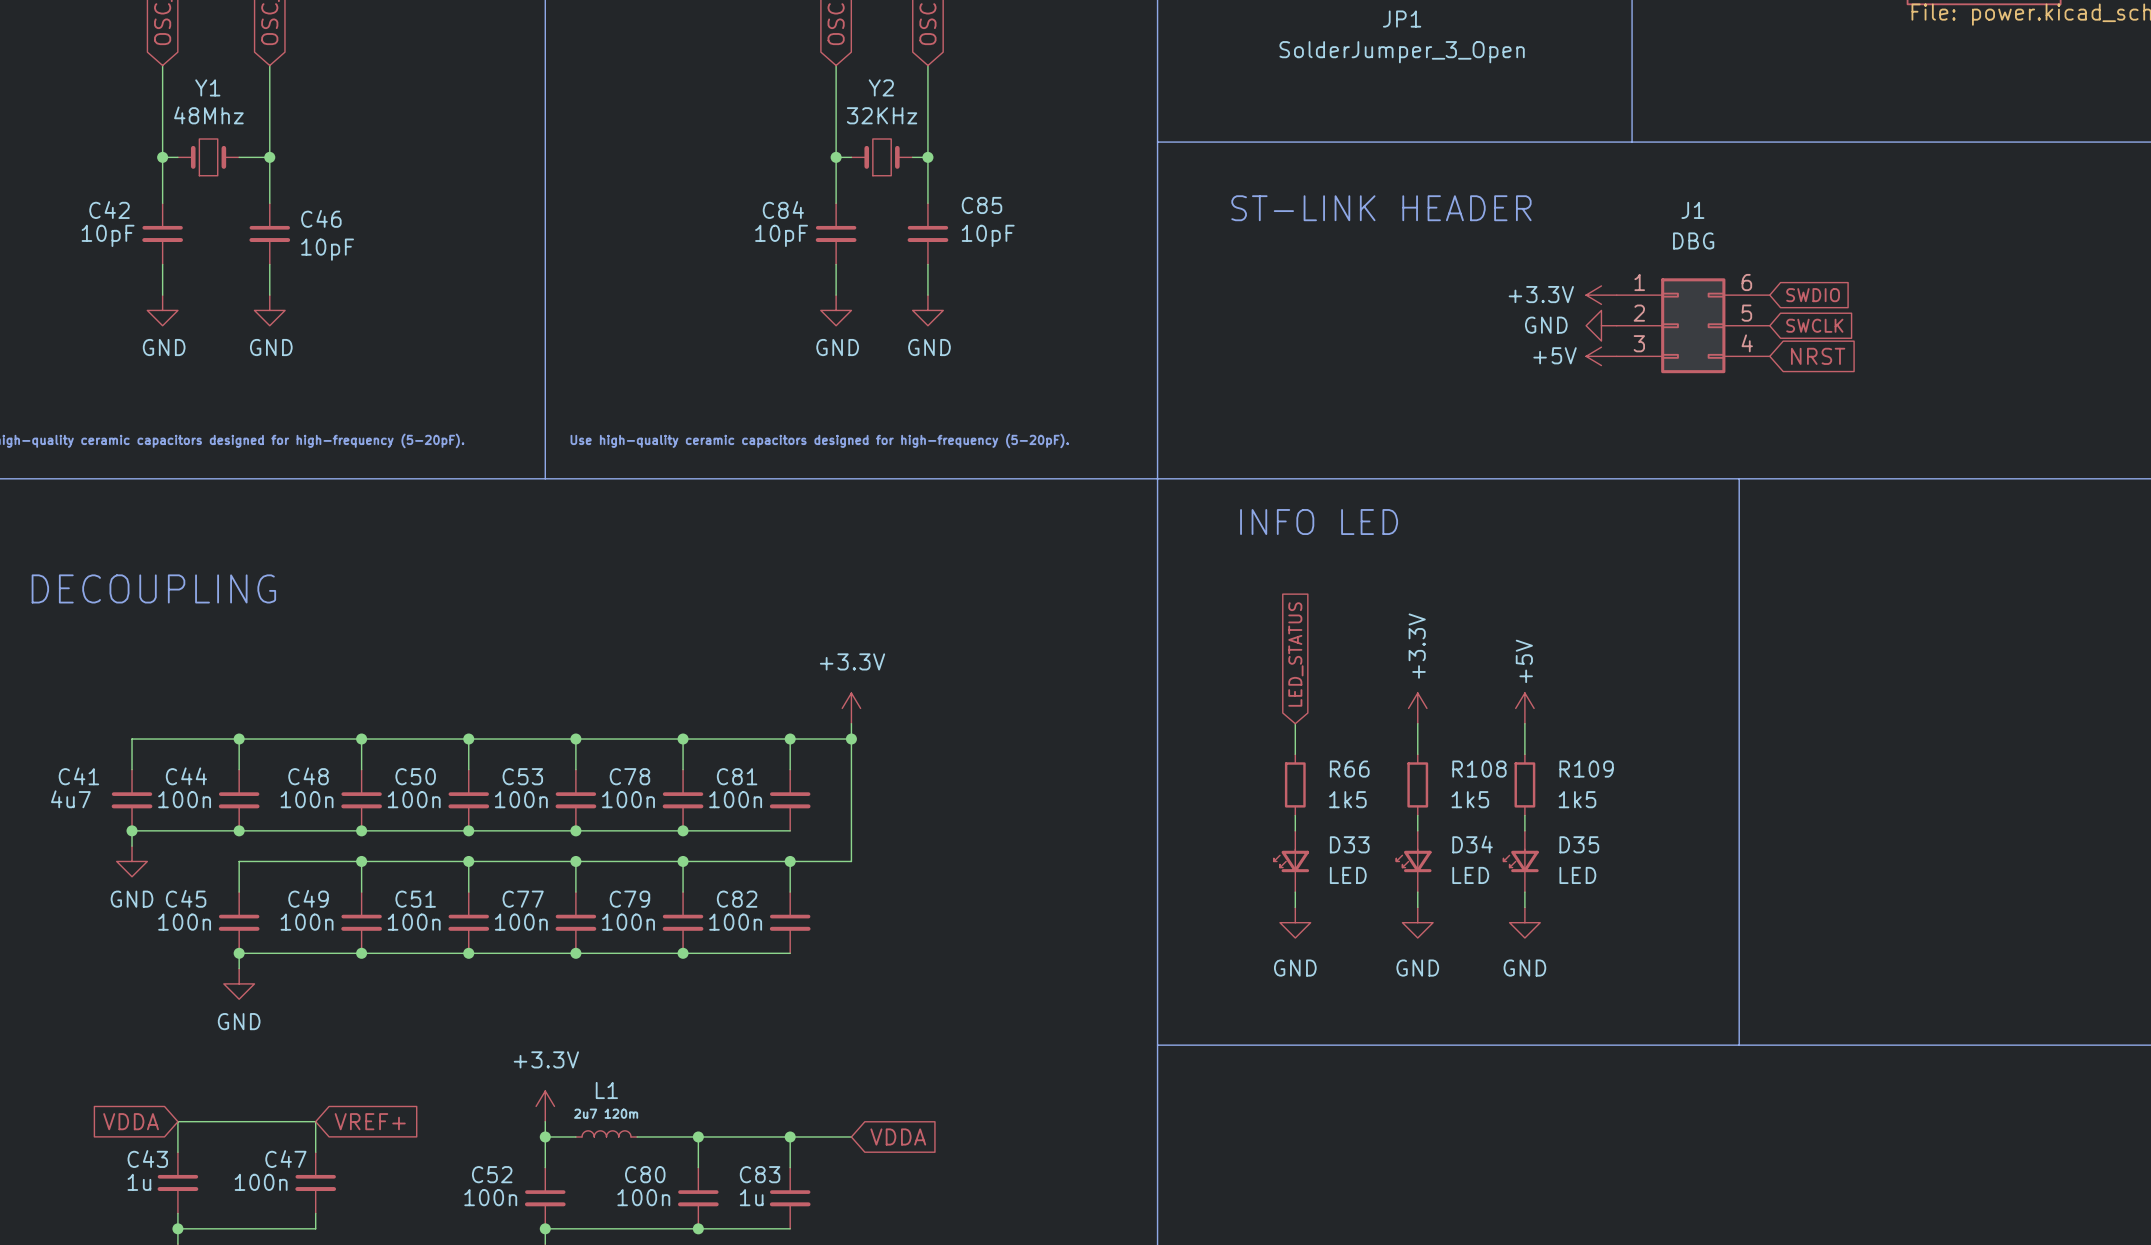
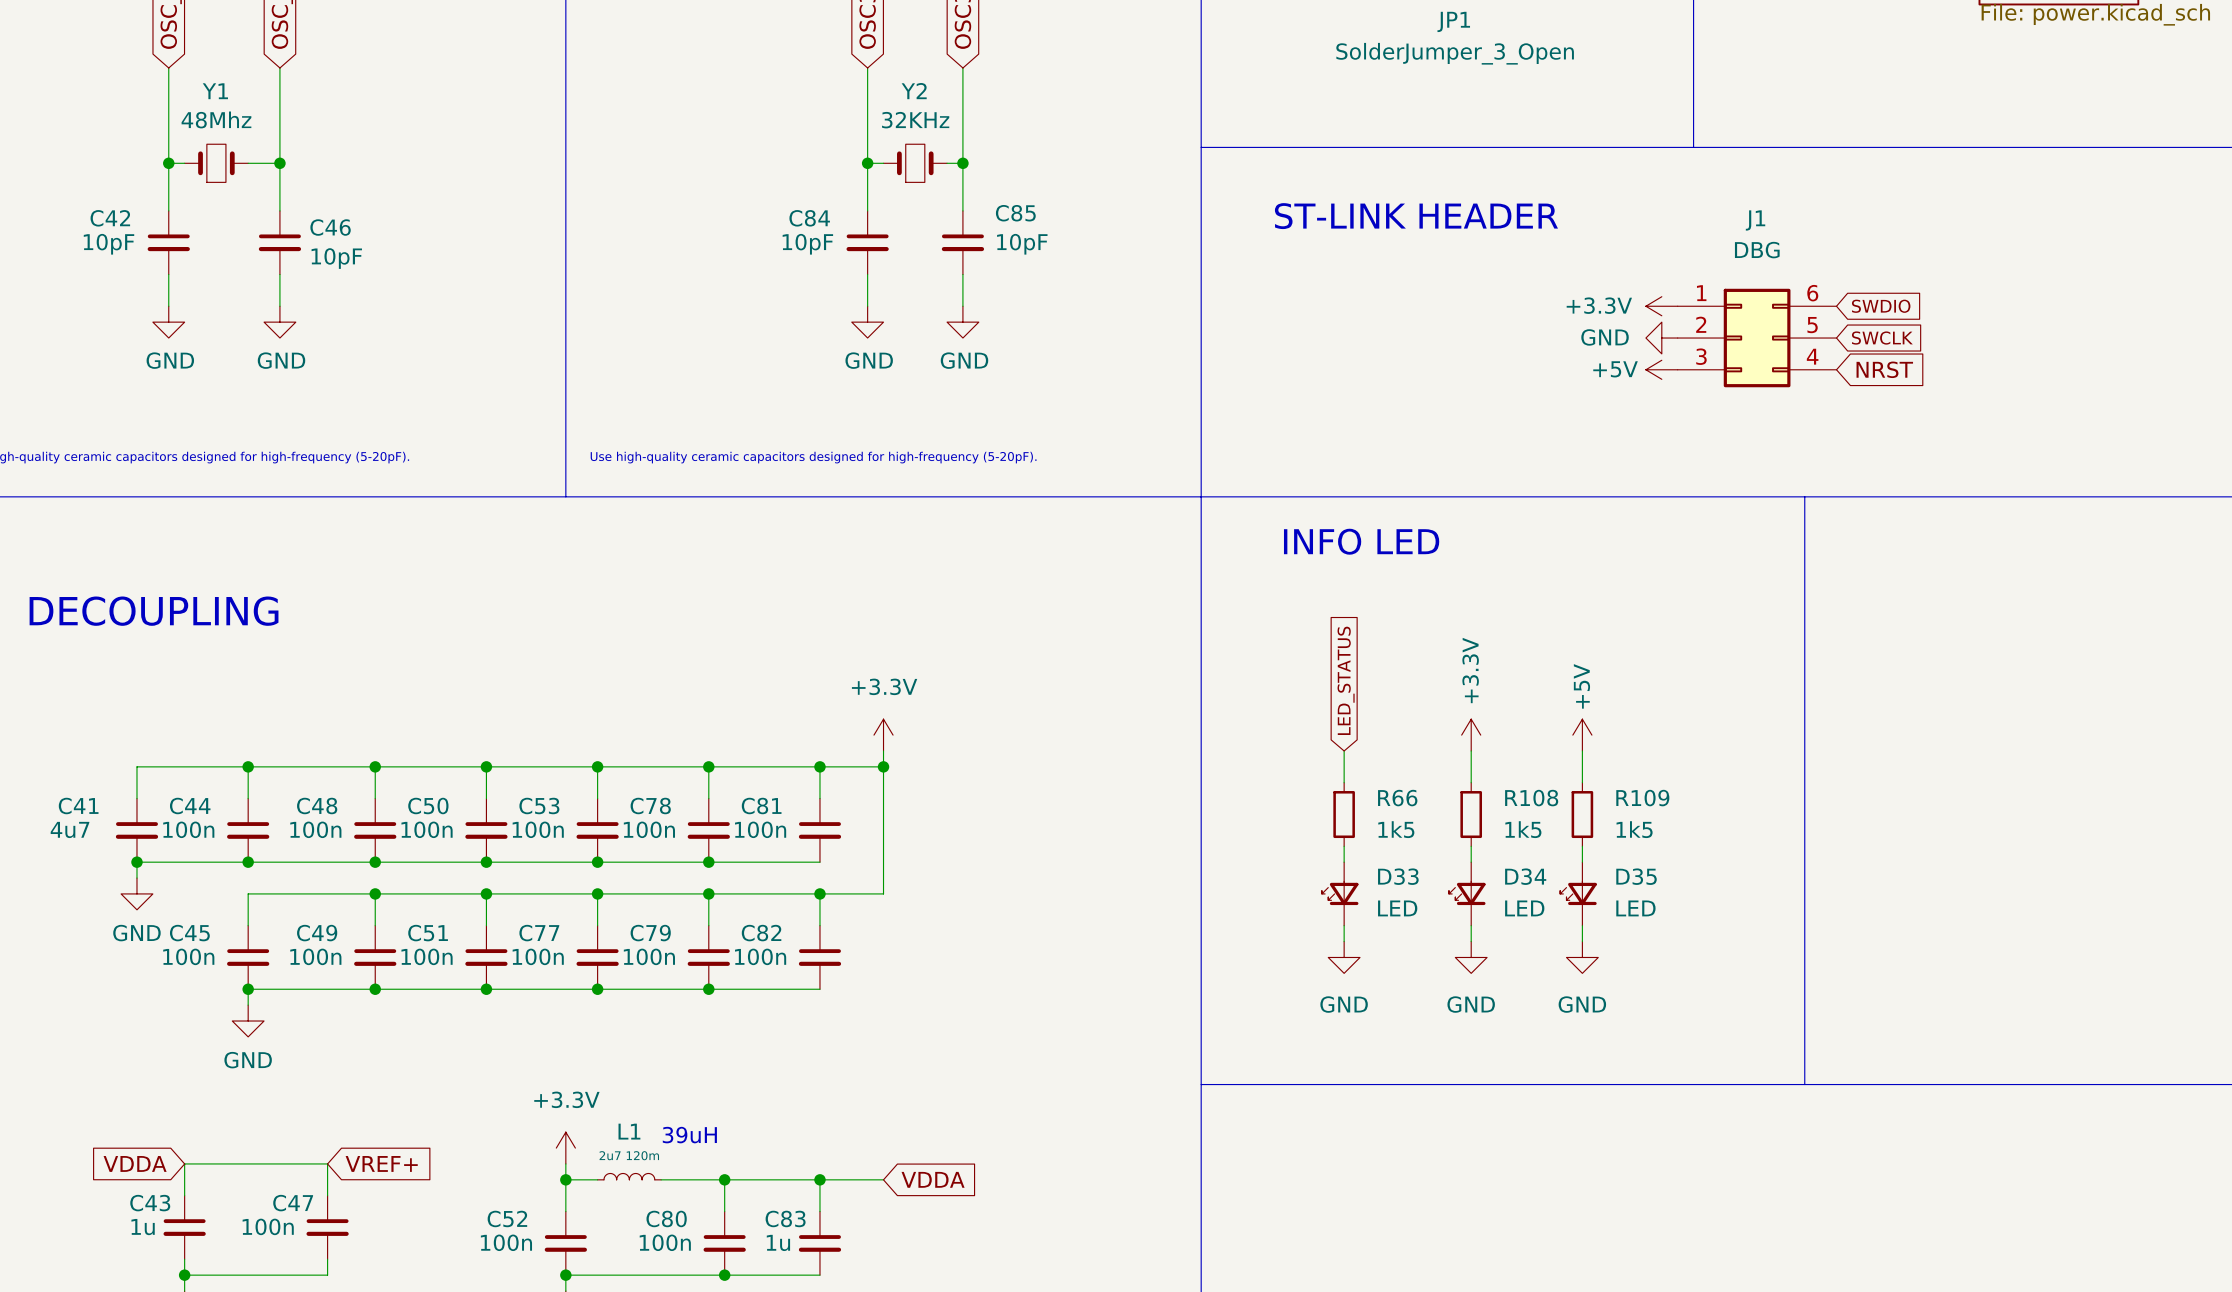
text: none -> 39uH (689, 1135)

